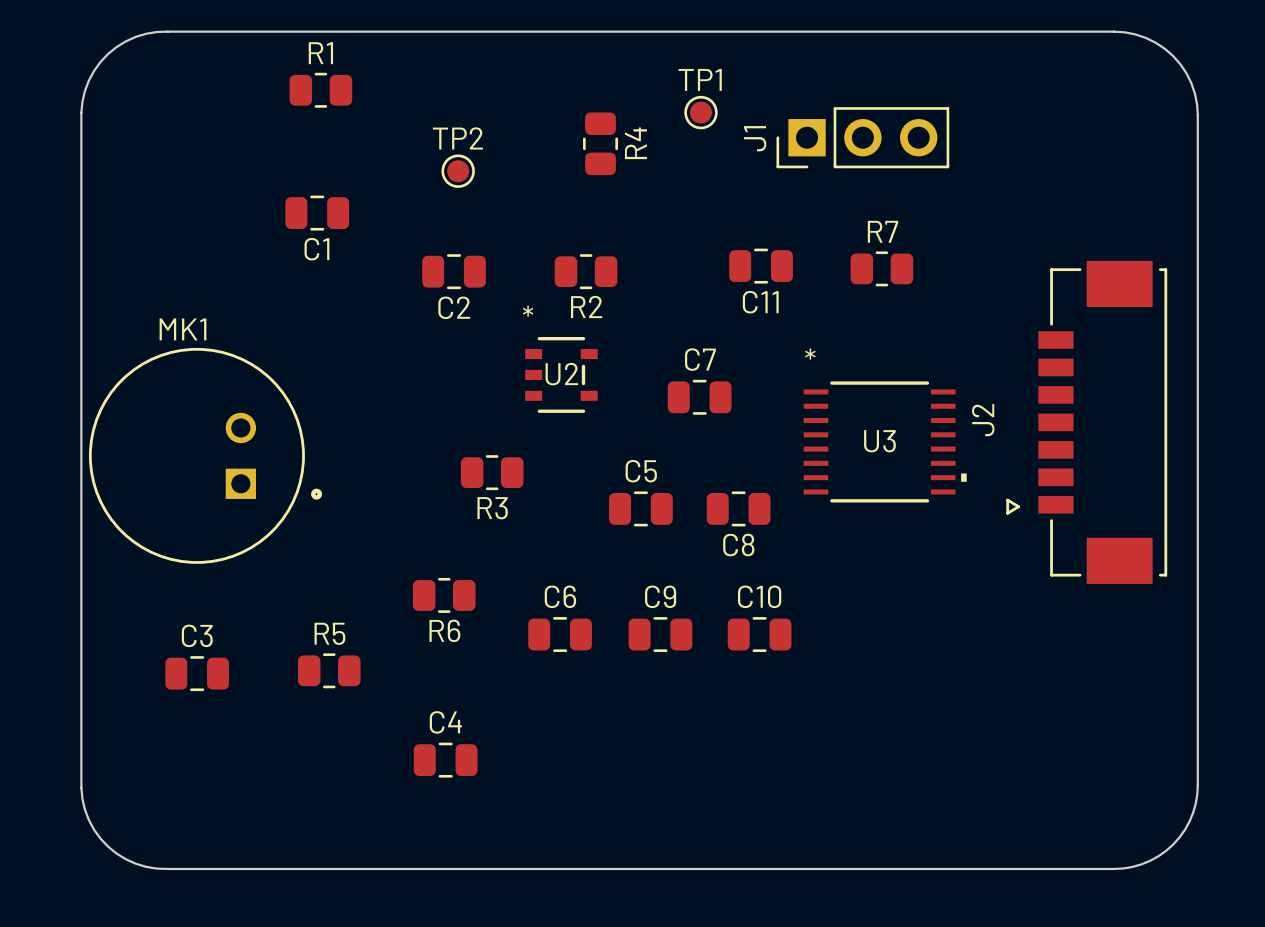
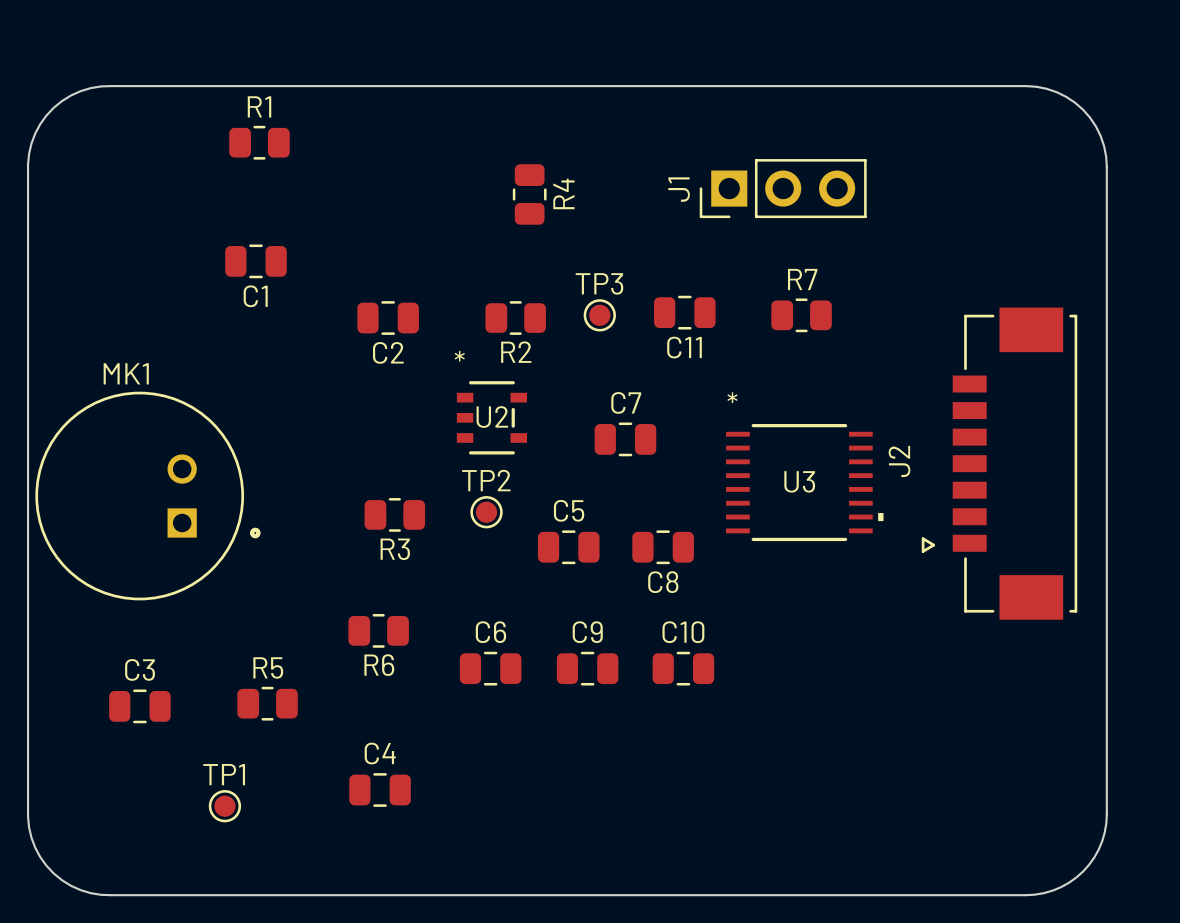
TP1 position: (700, 112) -> (224, 806)
TP2 position: (458, 171) -> (486, 512)
TP3: none -> (599, 315)
R3 position: (492, 472) -> (394, 514)

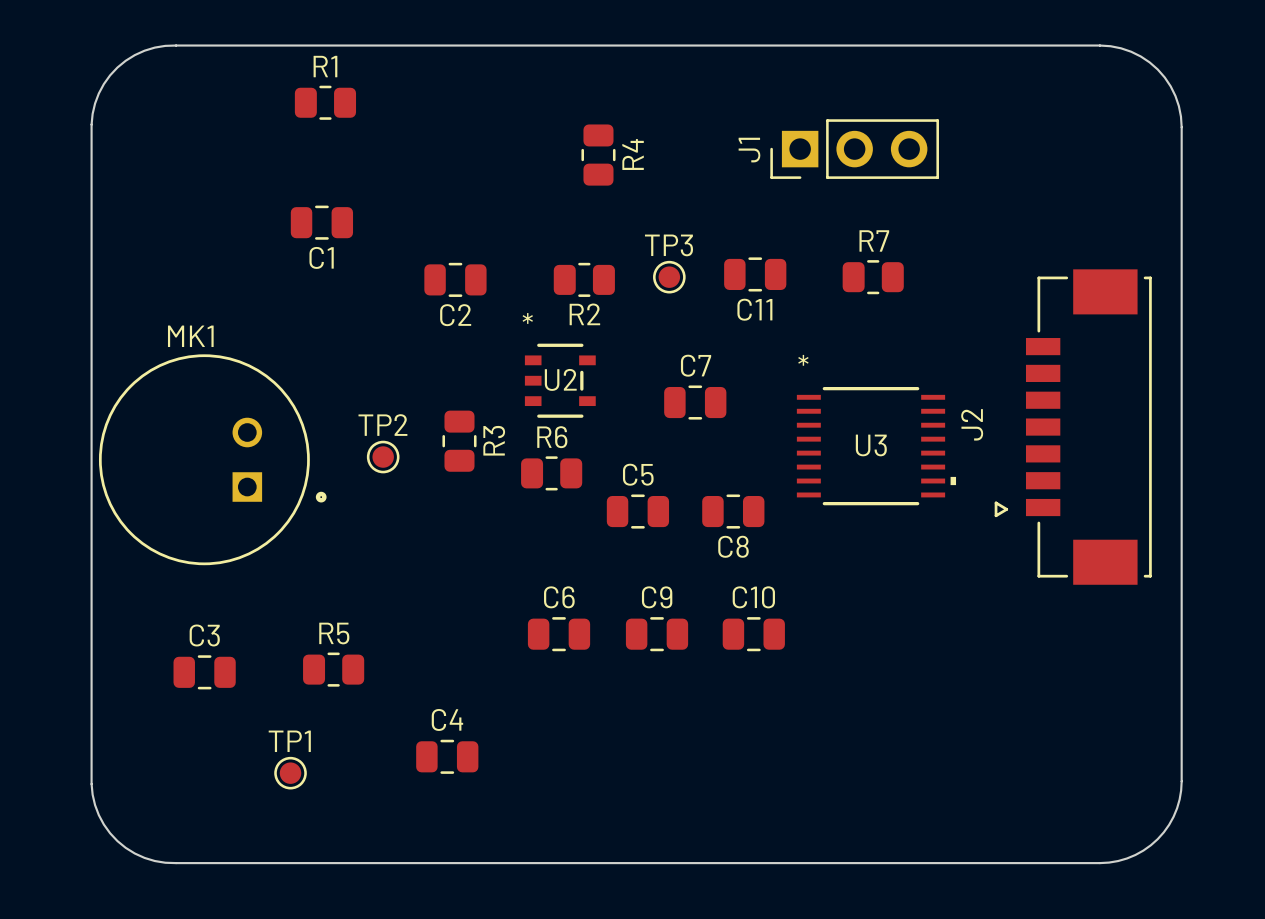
TP2 position: (486, 512) -> (383, 457)
R3 rotation: 0° (394, 514) -> 90° clockwise (459, 441)
R3 position: (394, 514) -> (459, 441)
R3 name position: R3 (395, 549) -> R3 (494, 440)
R6 position: (378, 630) -> (551, 473)
R6 name position: R6 (379, 665) -> R6 (552, 437)

